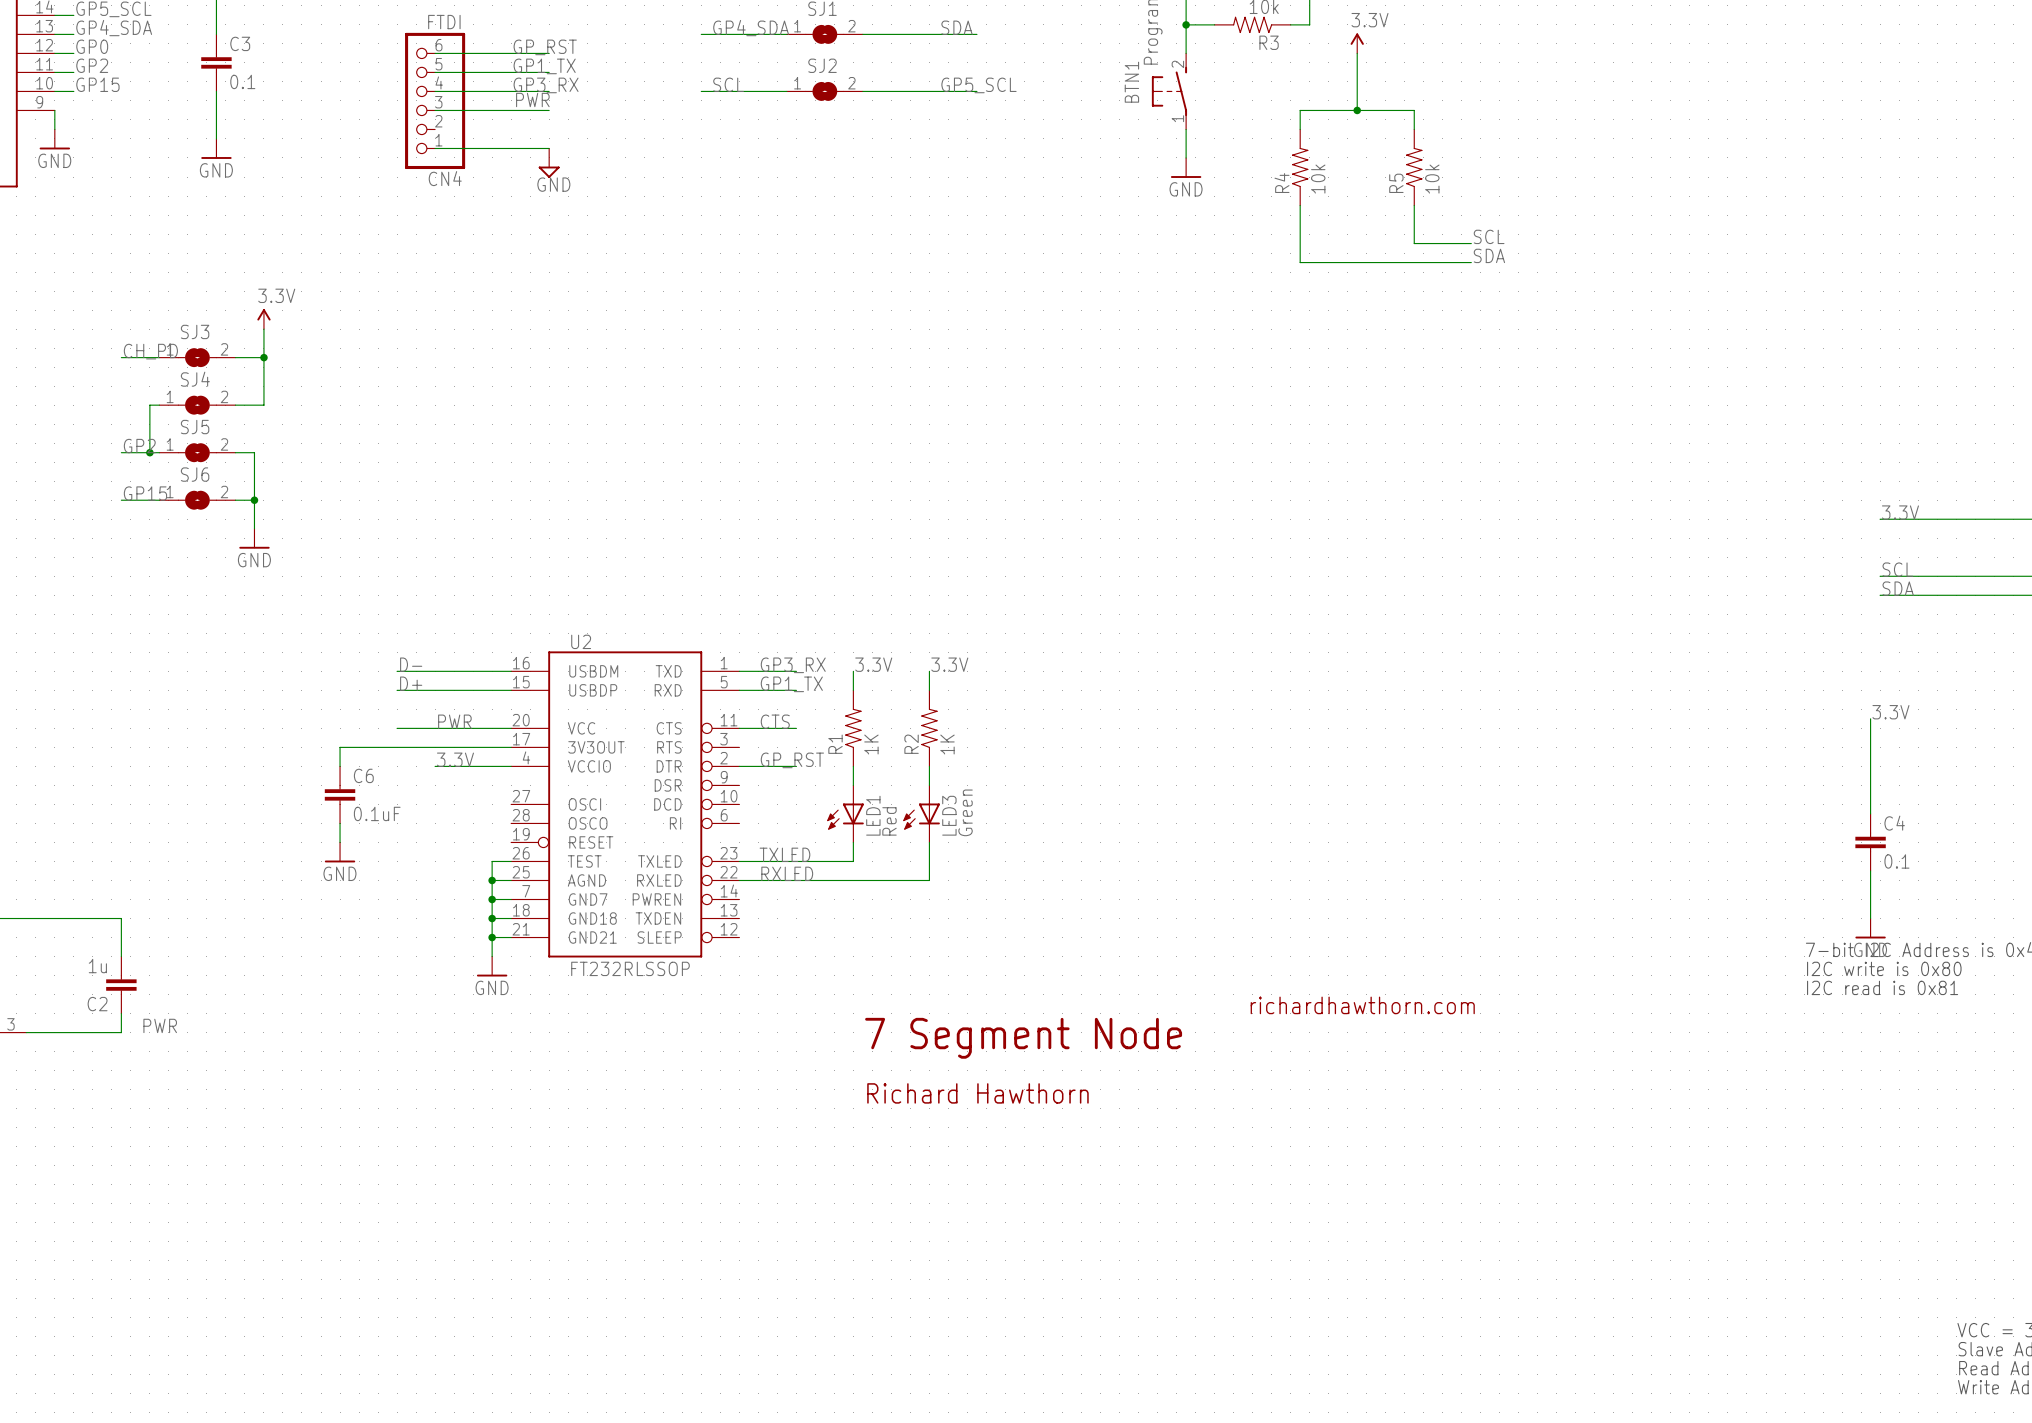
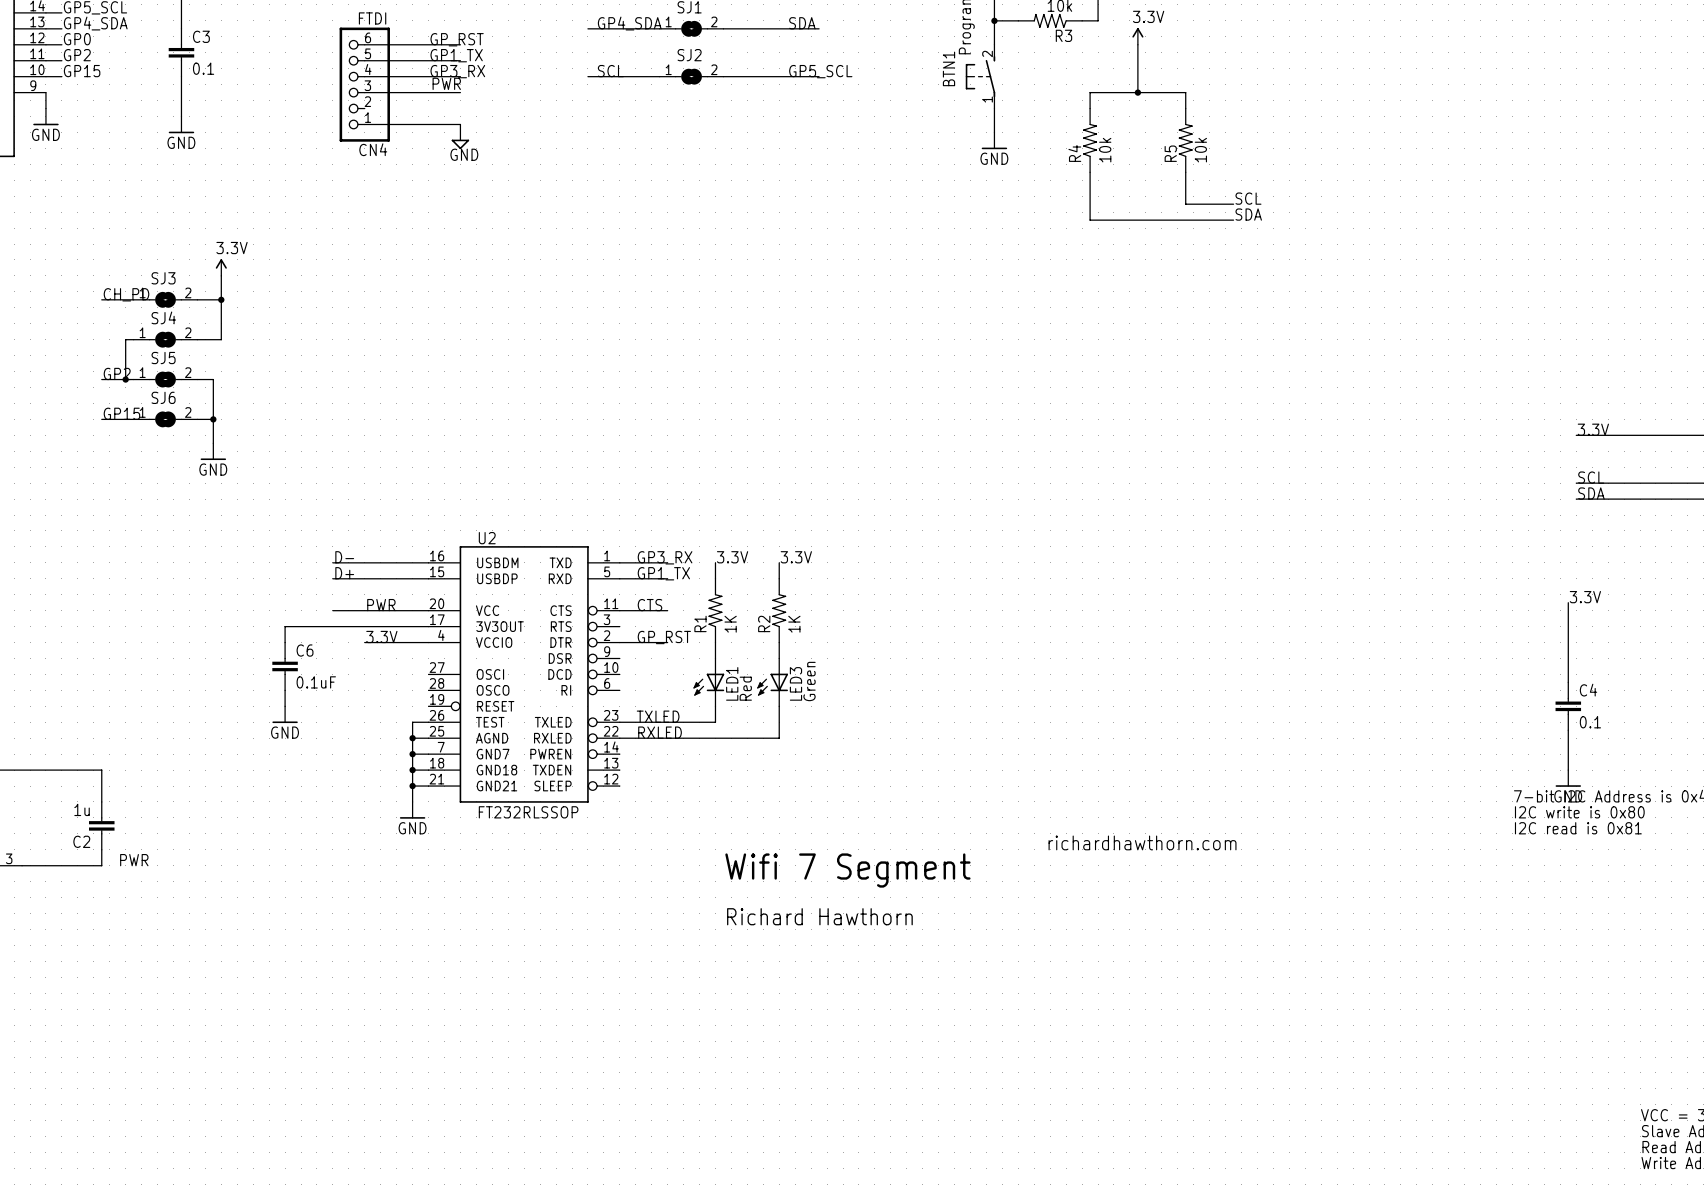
text: 7 Segment Node (1023, 1038) -> Wifi 7 Segment (847, 870)

